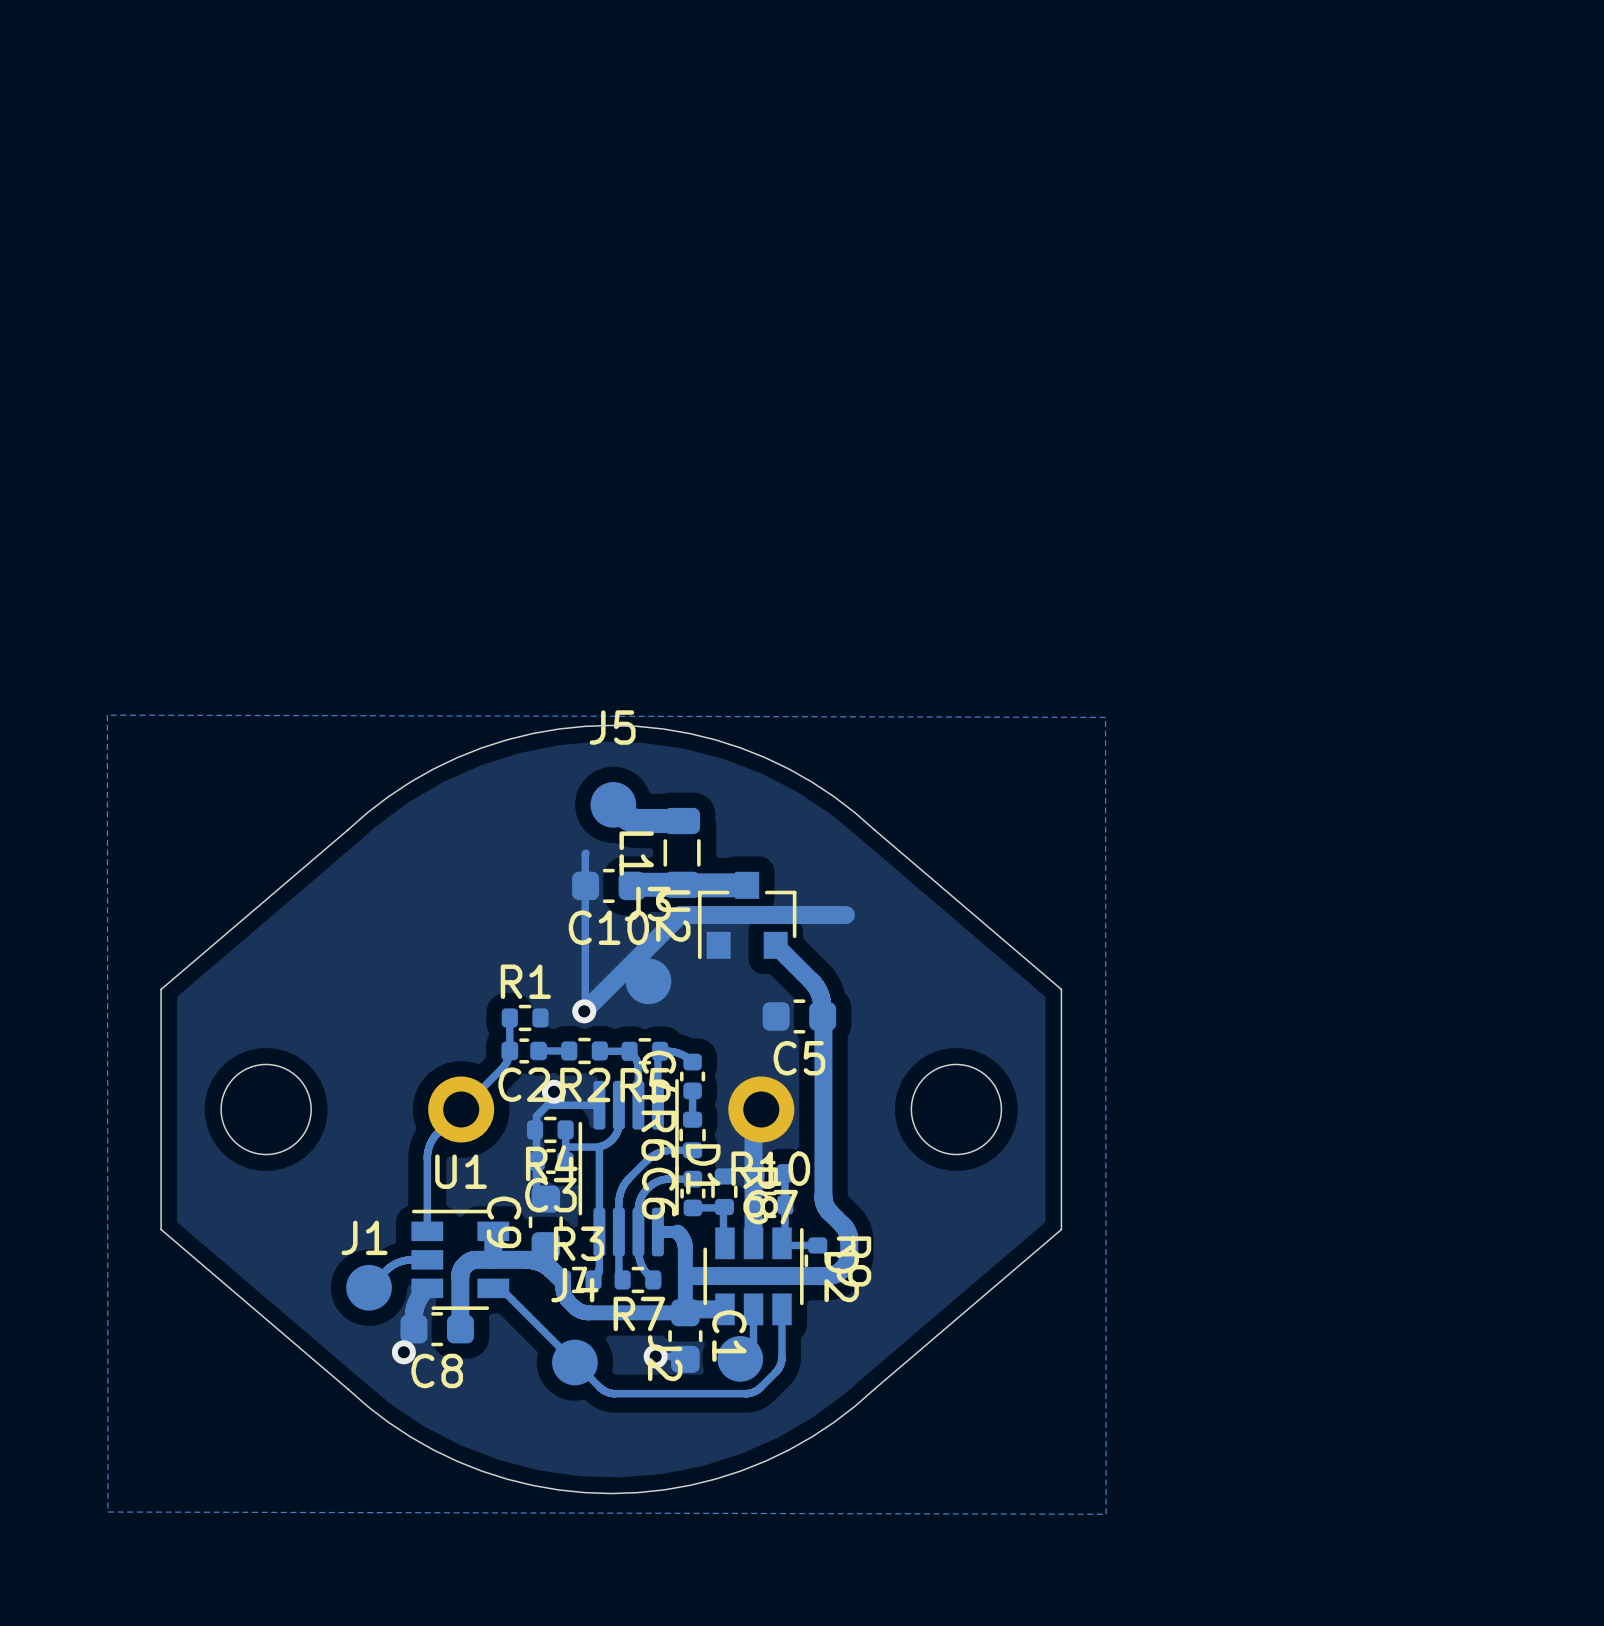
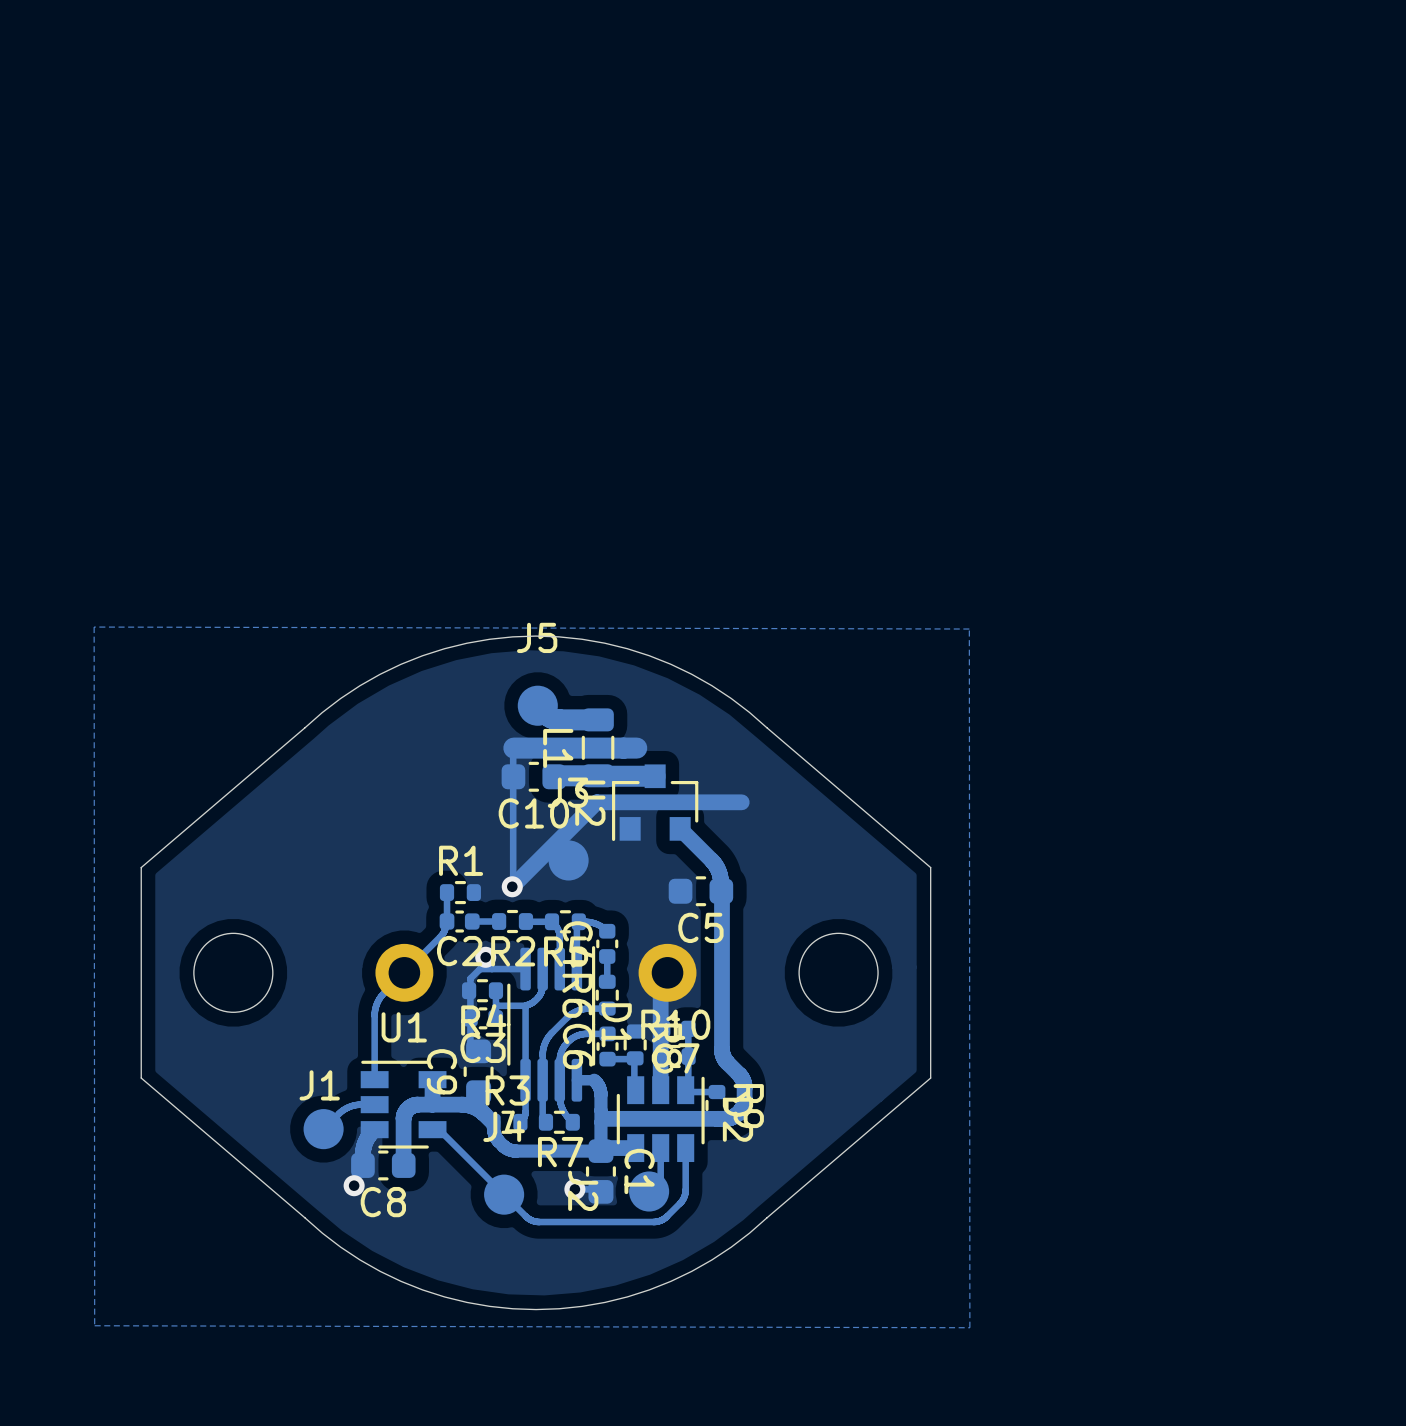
track: none -> (636, 748) (513, 748)

